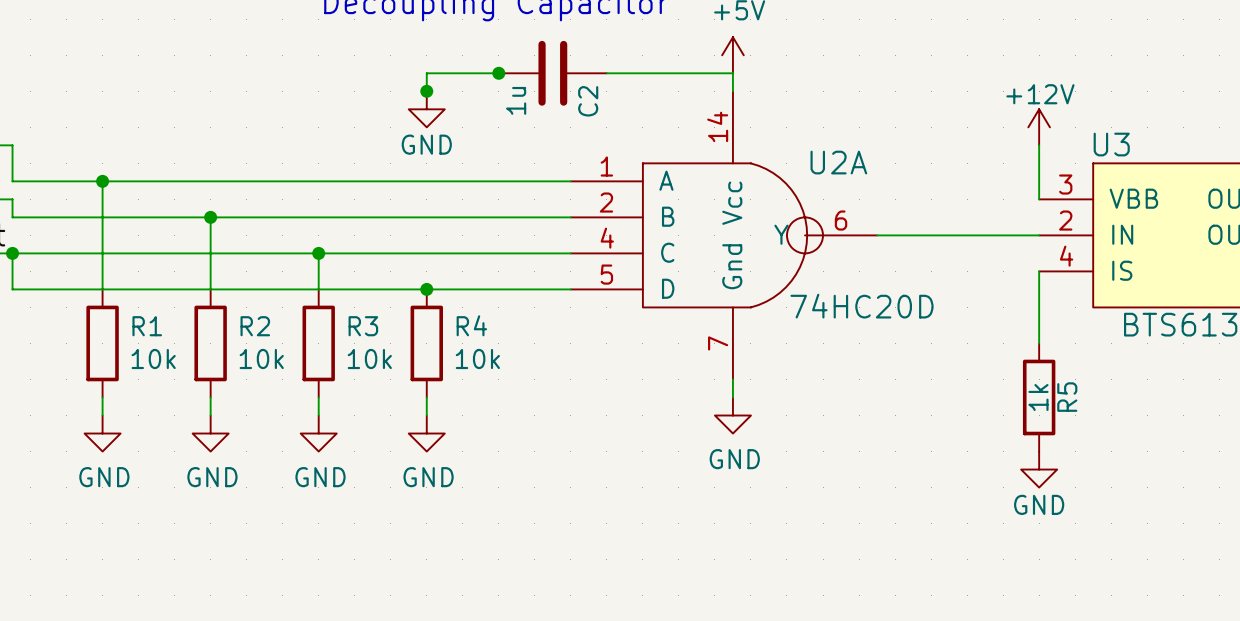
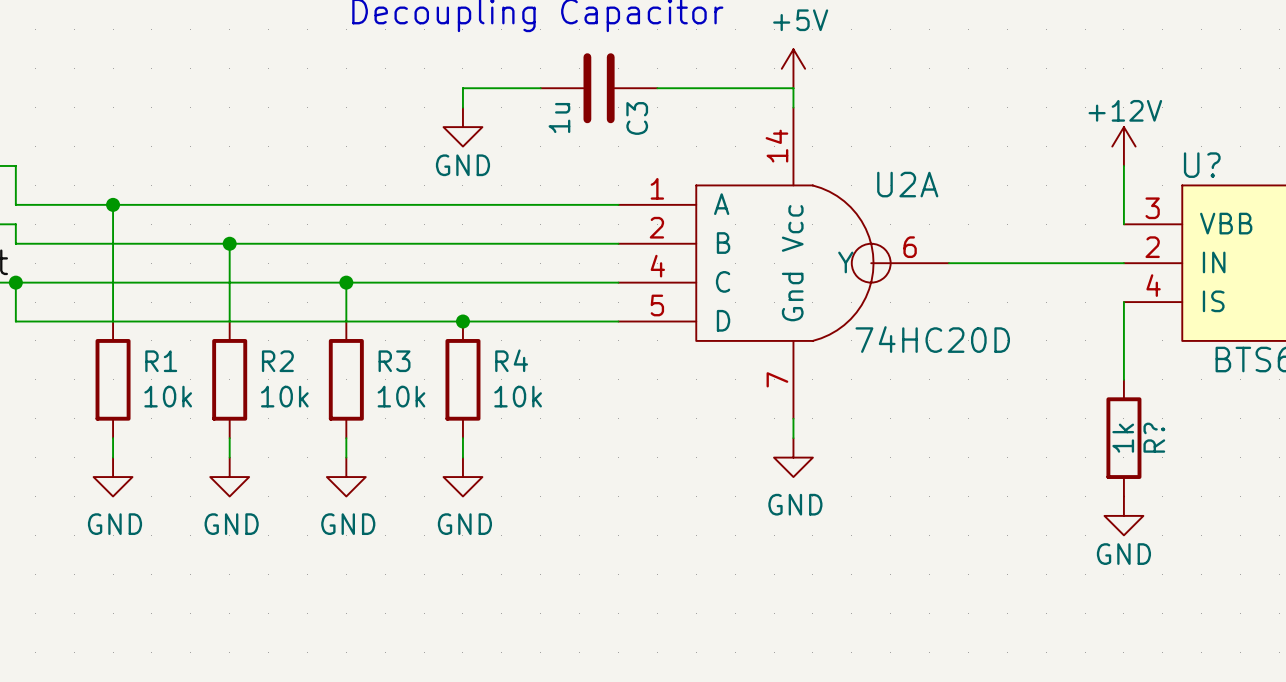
junction: (498, 73) -> none
junction: (426, 91) -> none
C2 name: C2 (588, 101) -> C3 (637, 118)
U3 name: U3 (1111, 144) -> U? (1202, 165)
R5 name: R5 (1067, 397) -> R? (1154, 437)

